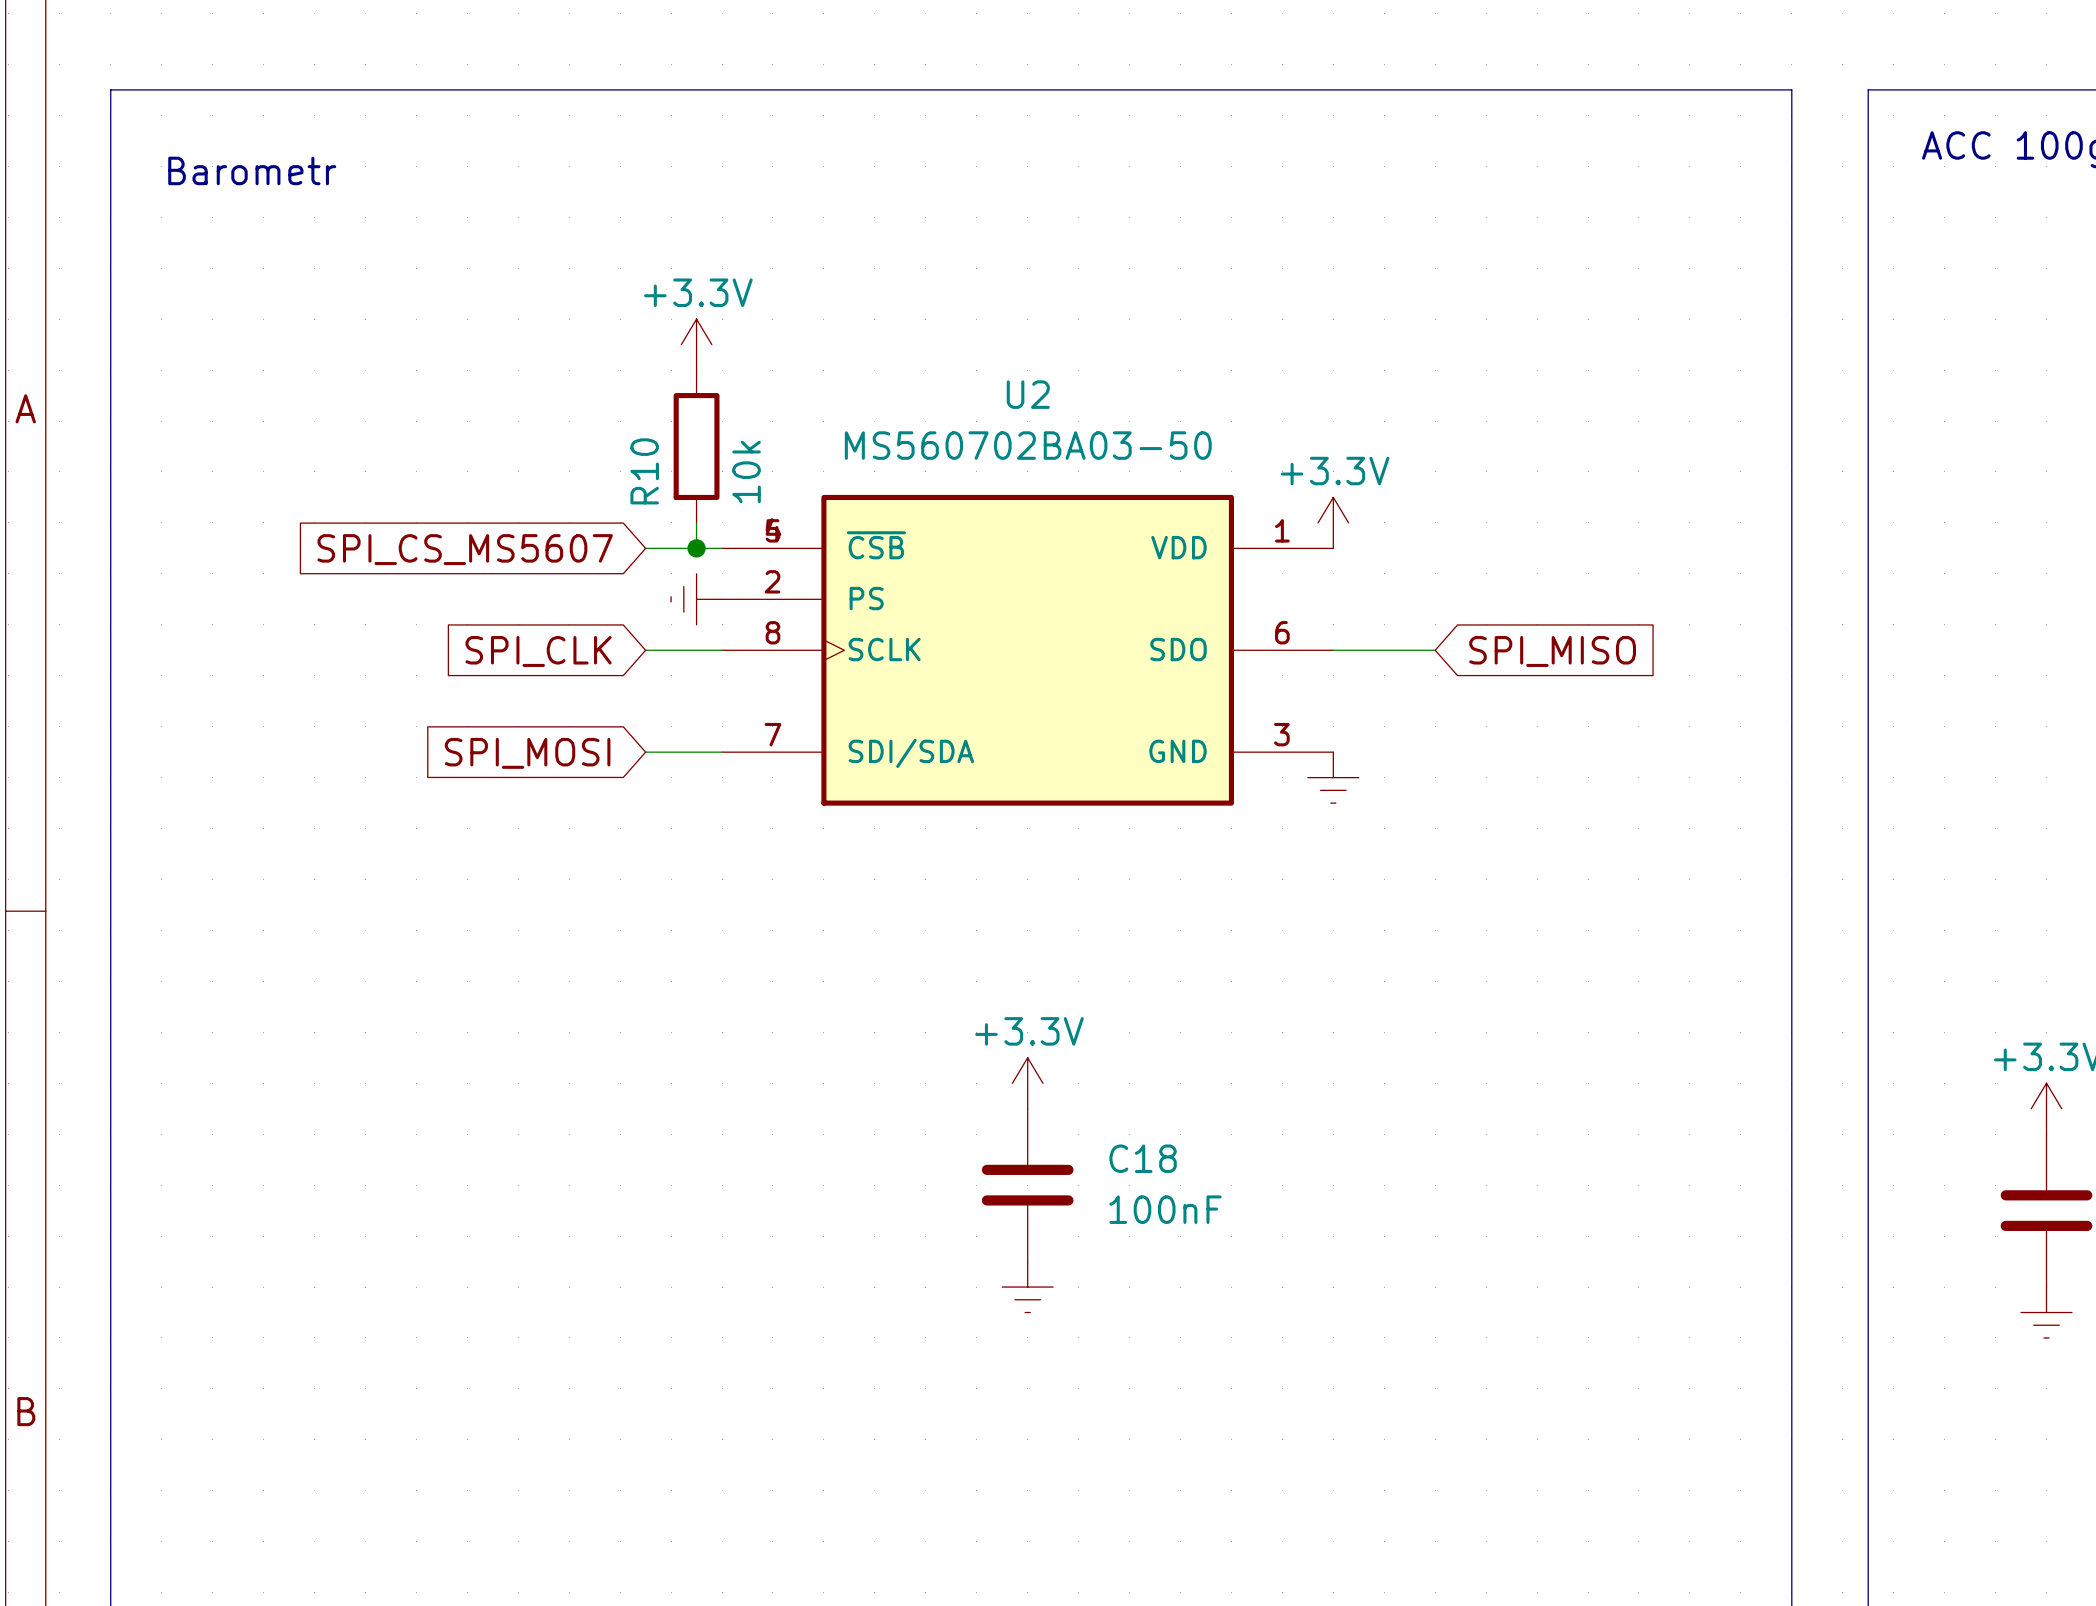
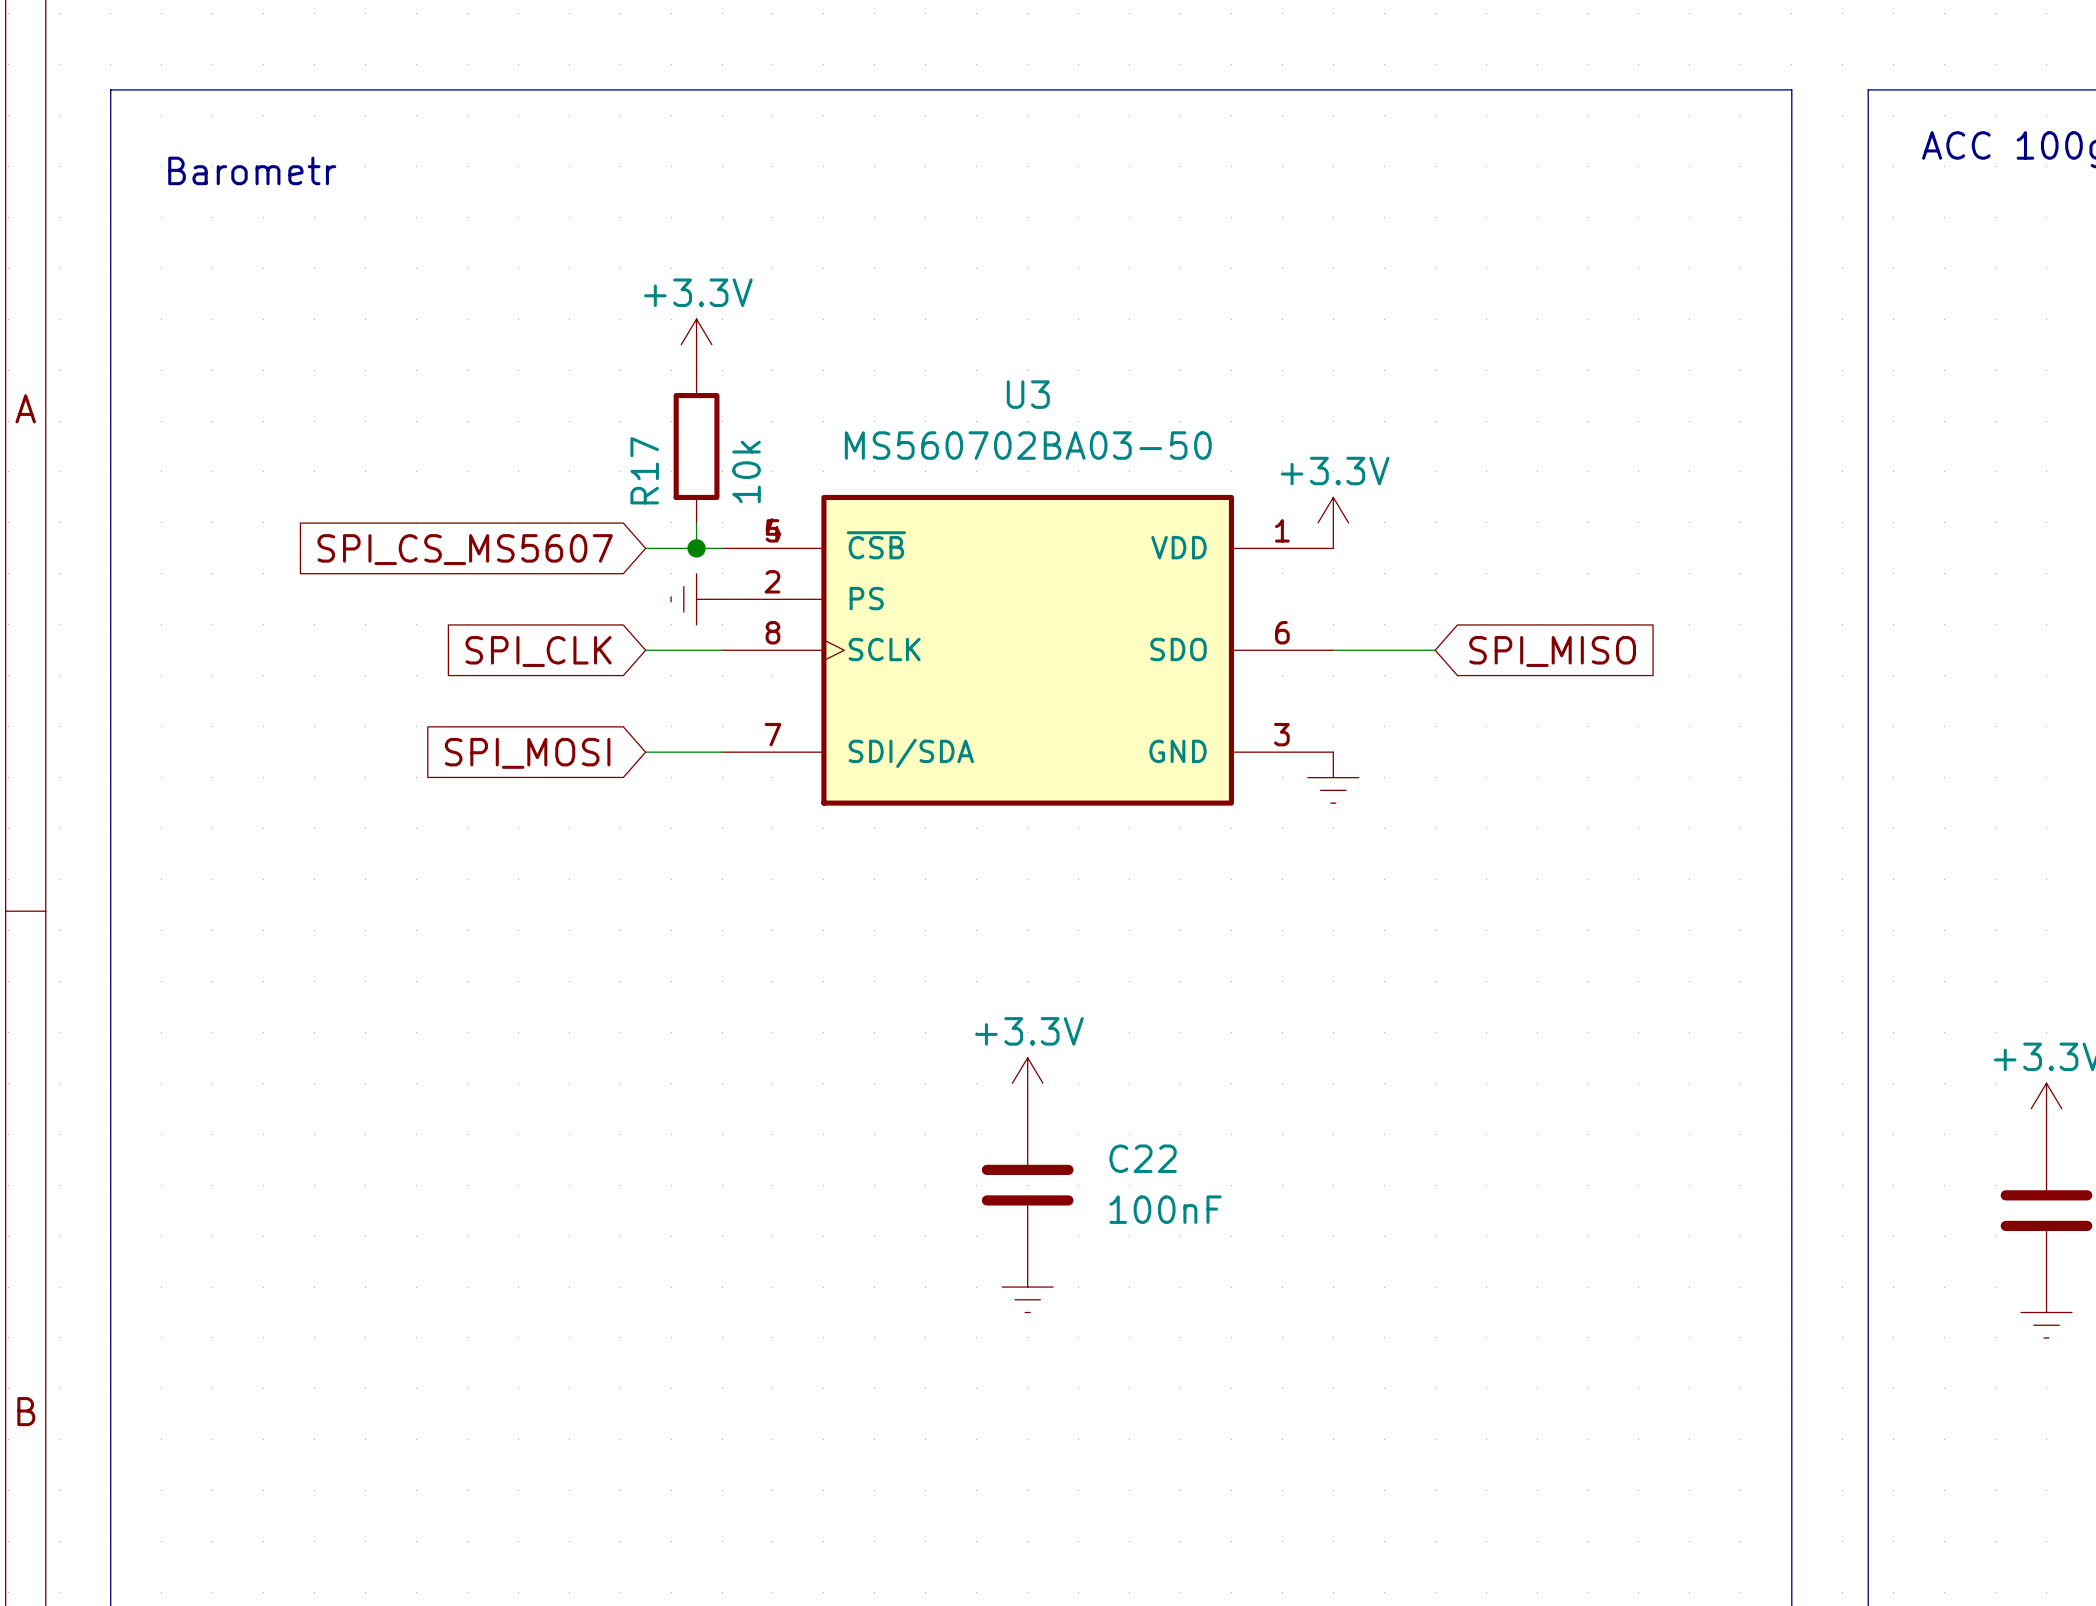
U2 name: U2 (1028, 394) -> U3 (1028, 394)
R10 name: R10 (644, 471) -> R17 (644, 470)
C18 name: C18 (1143, 1158) -> C22 (1143, 1158)

